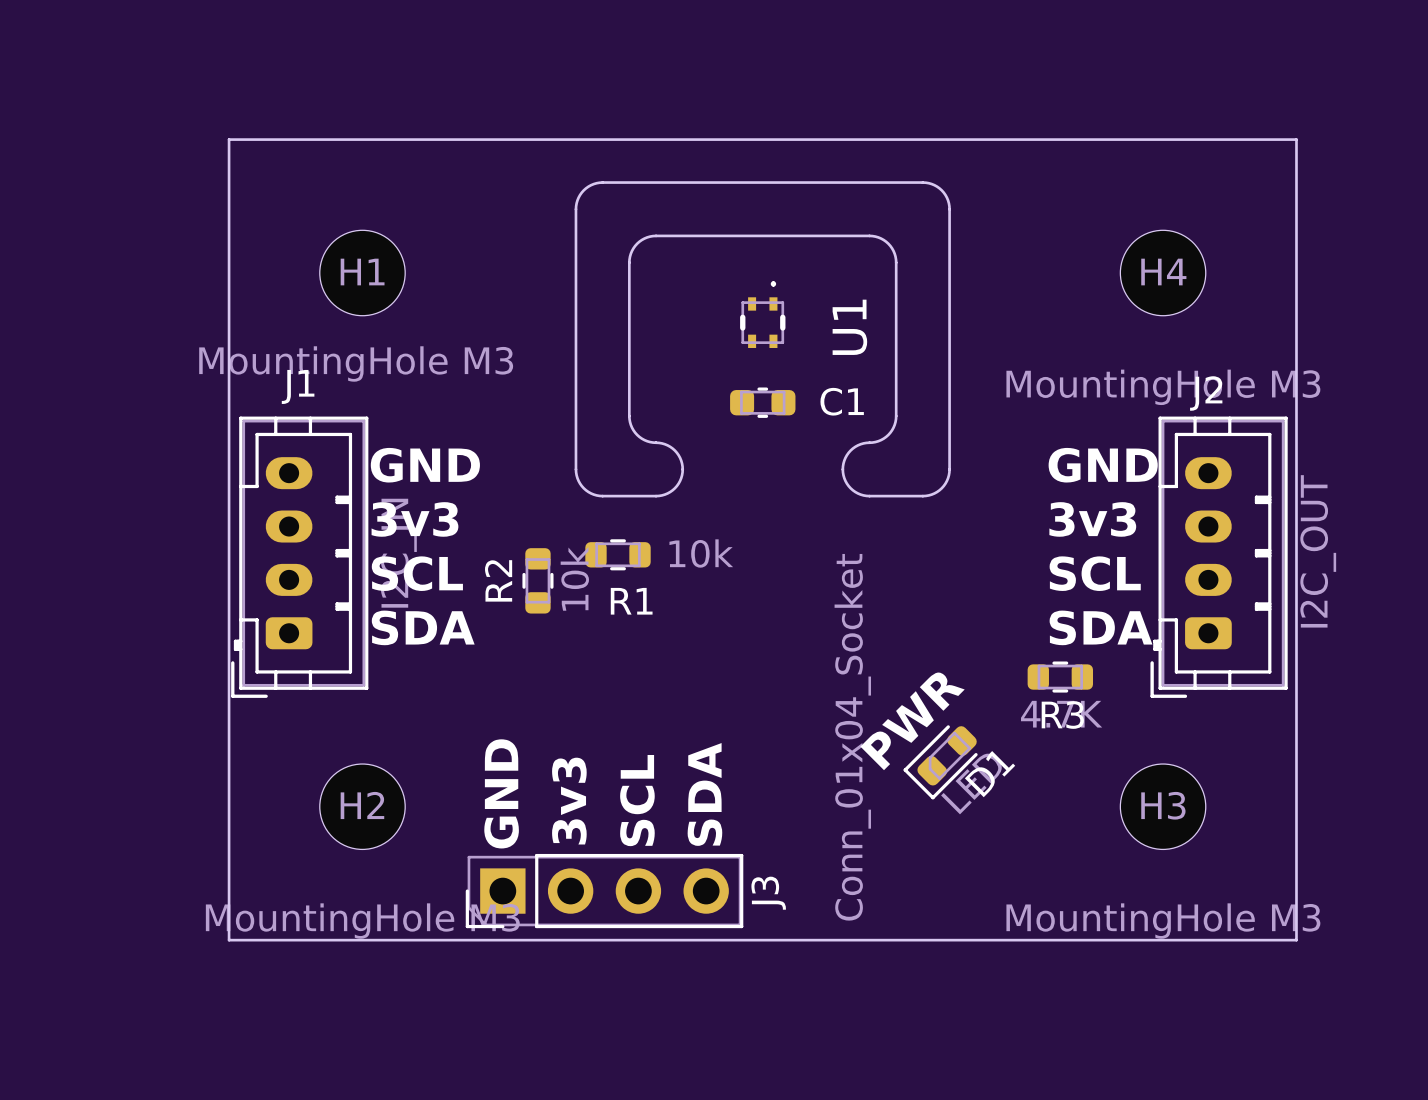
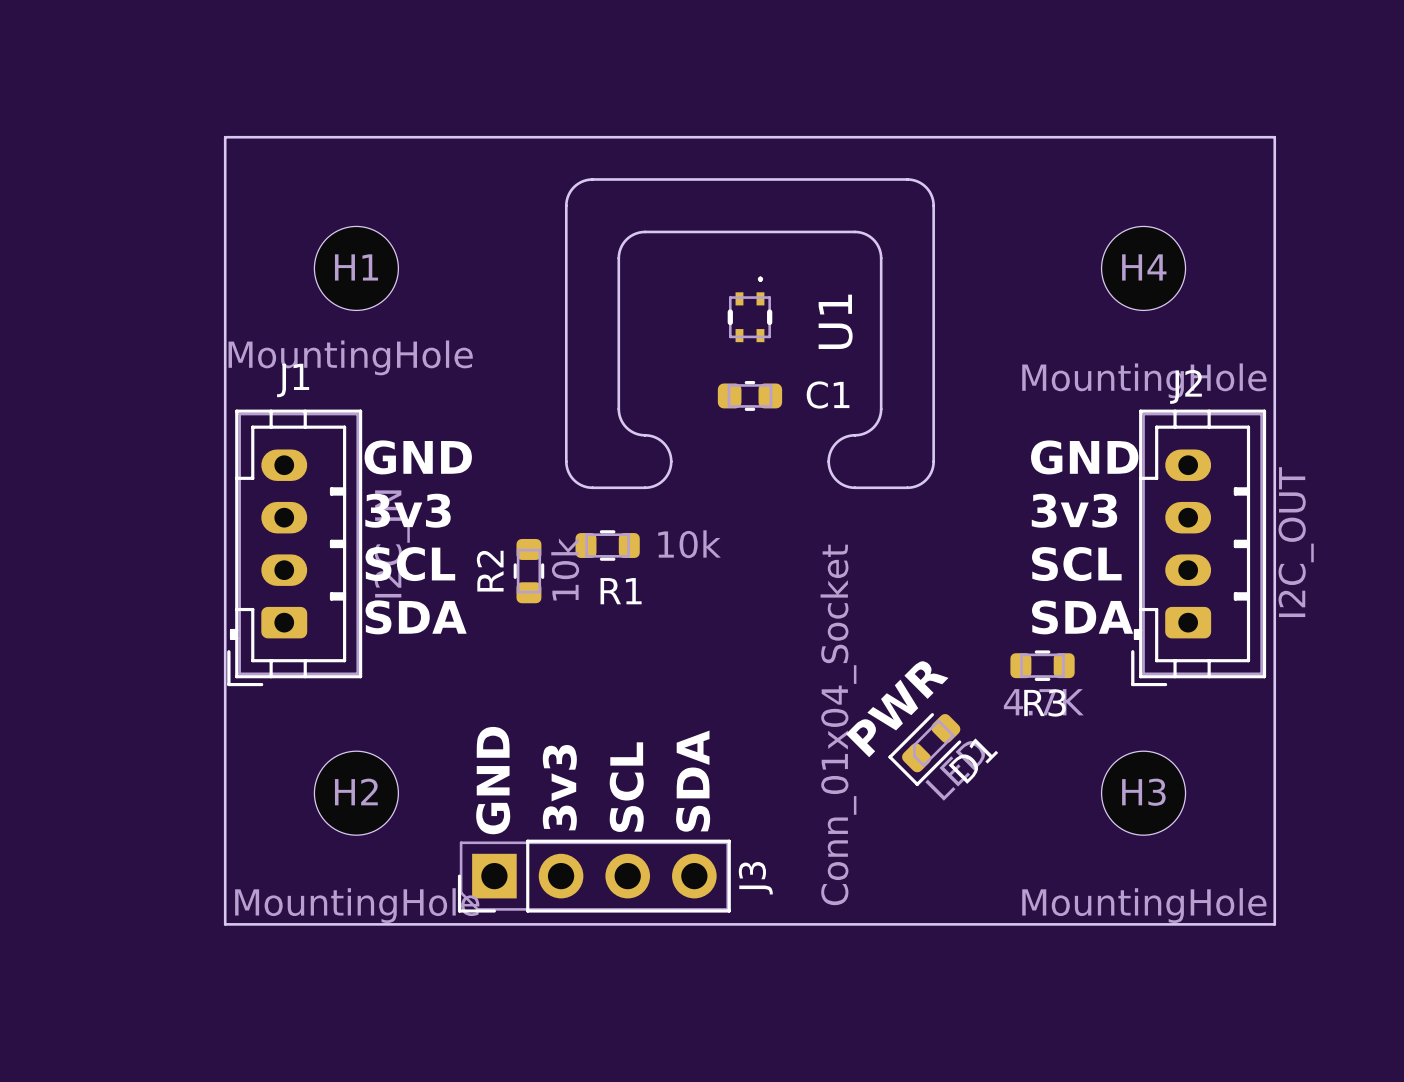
H1 value: MountingHole M3 (356, 363) -> MountingHole (350, 357)
H4 value: MountingHole M3 (1163, 387) -> MountingHole (1144, 380)
H2 value: MountingHole M3 (362, 921) -> MountingHole (357, 905)
H3 value: MountingHole M3 (1163, 921) -> MountingHole (1144, 905)

